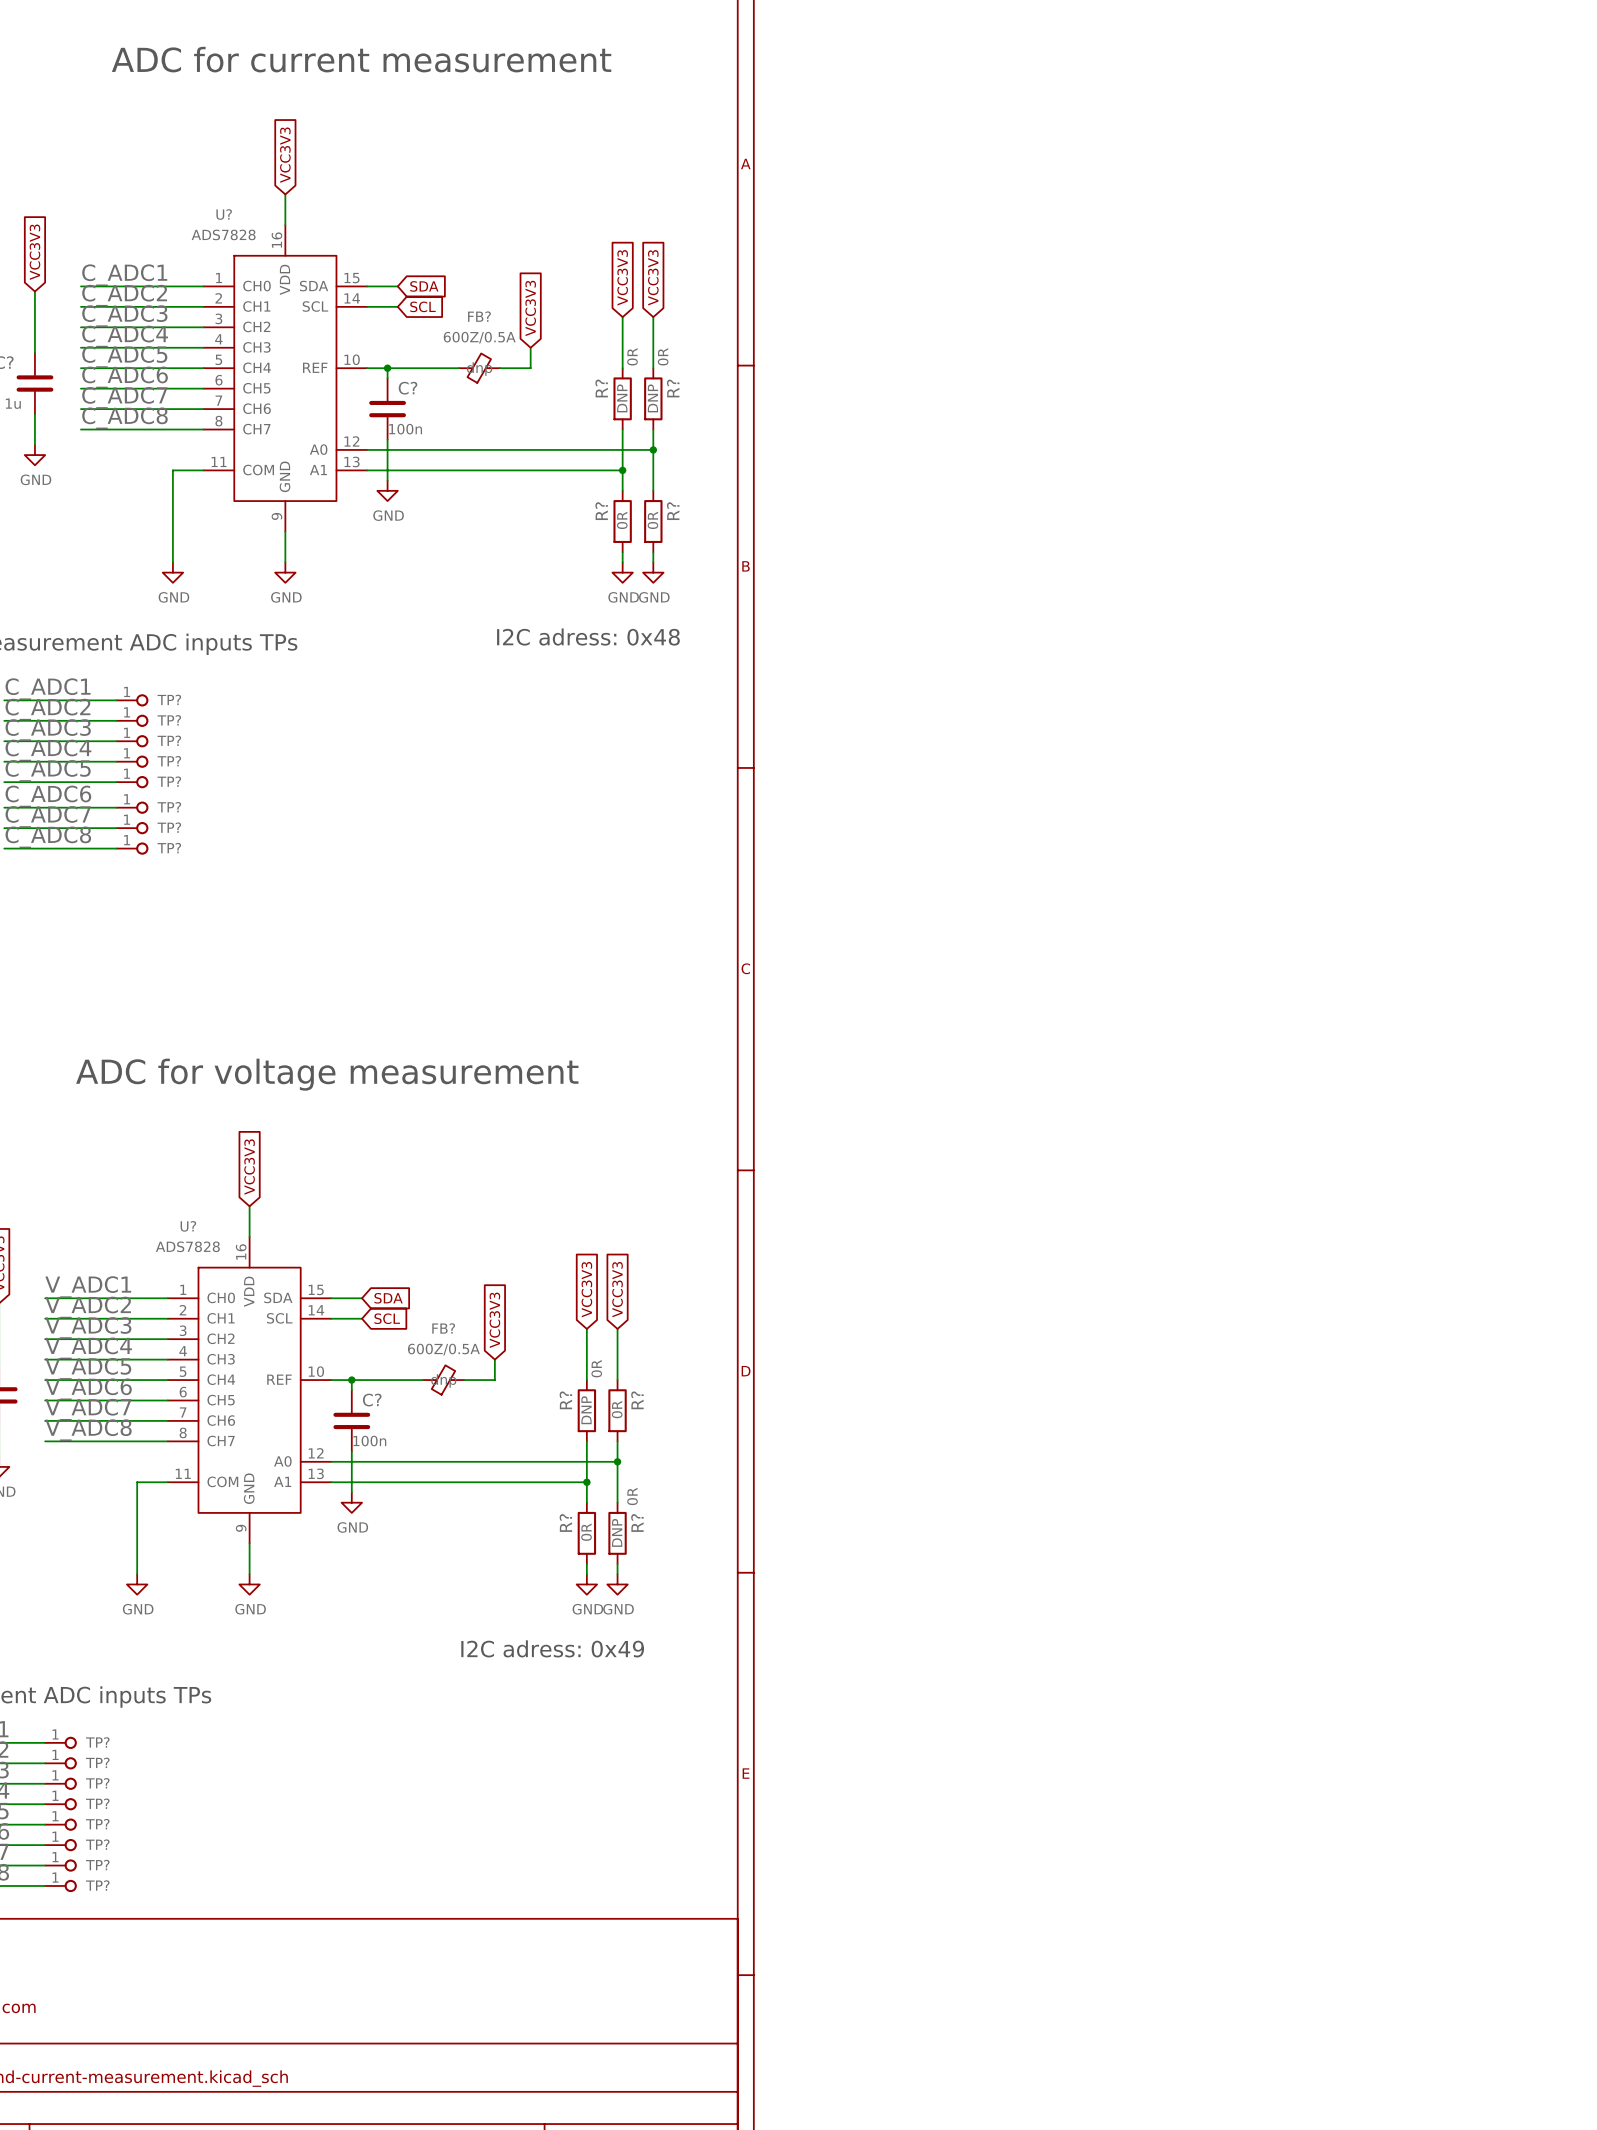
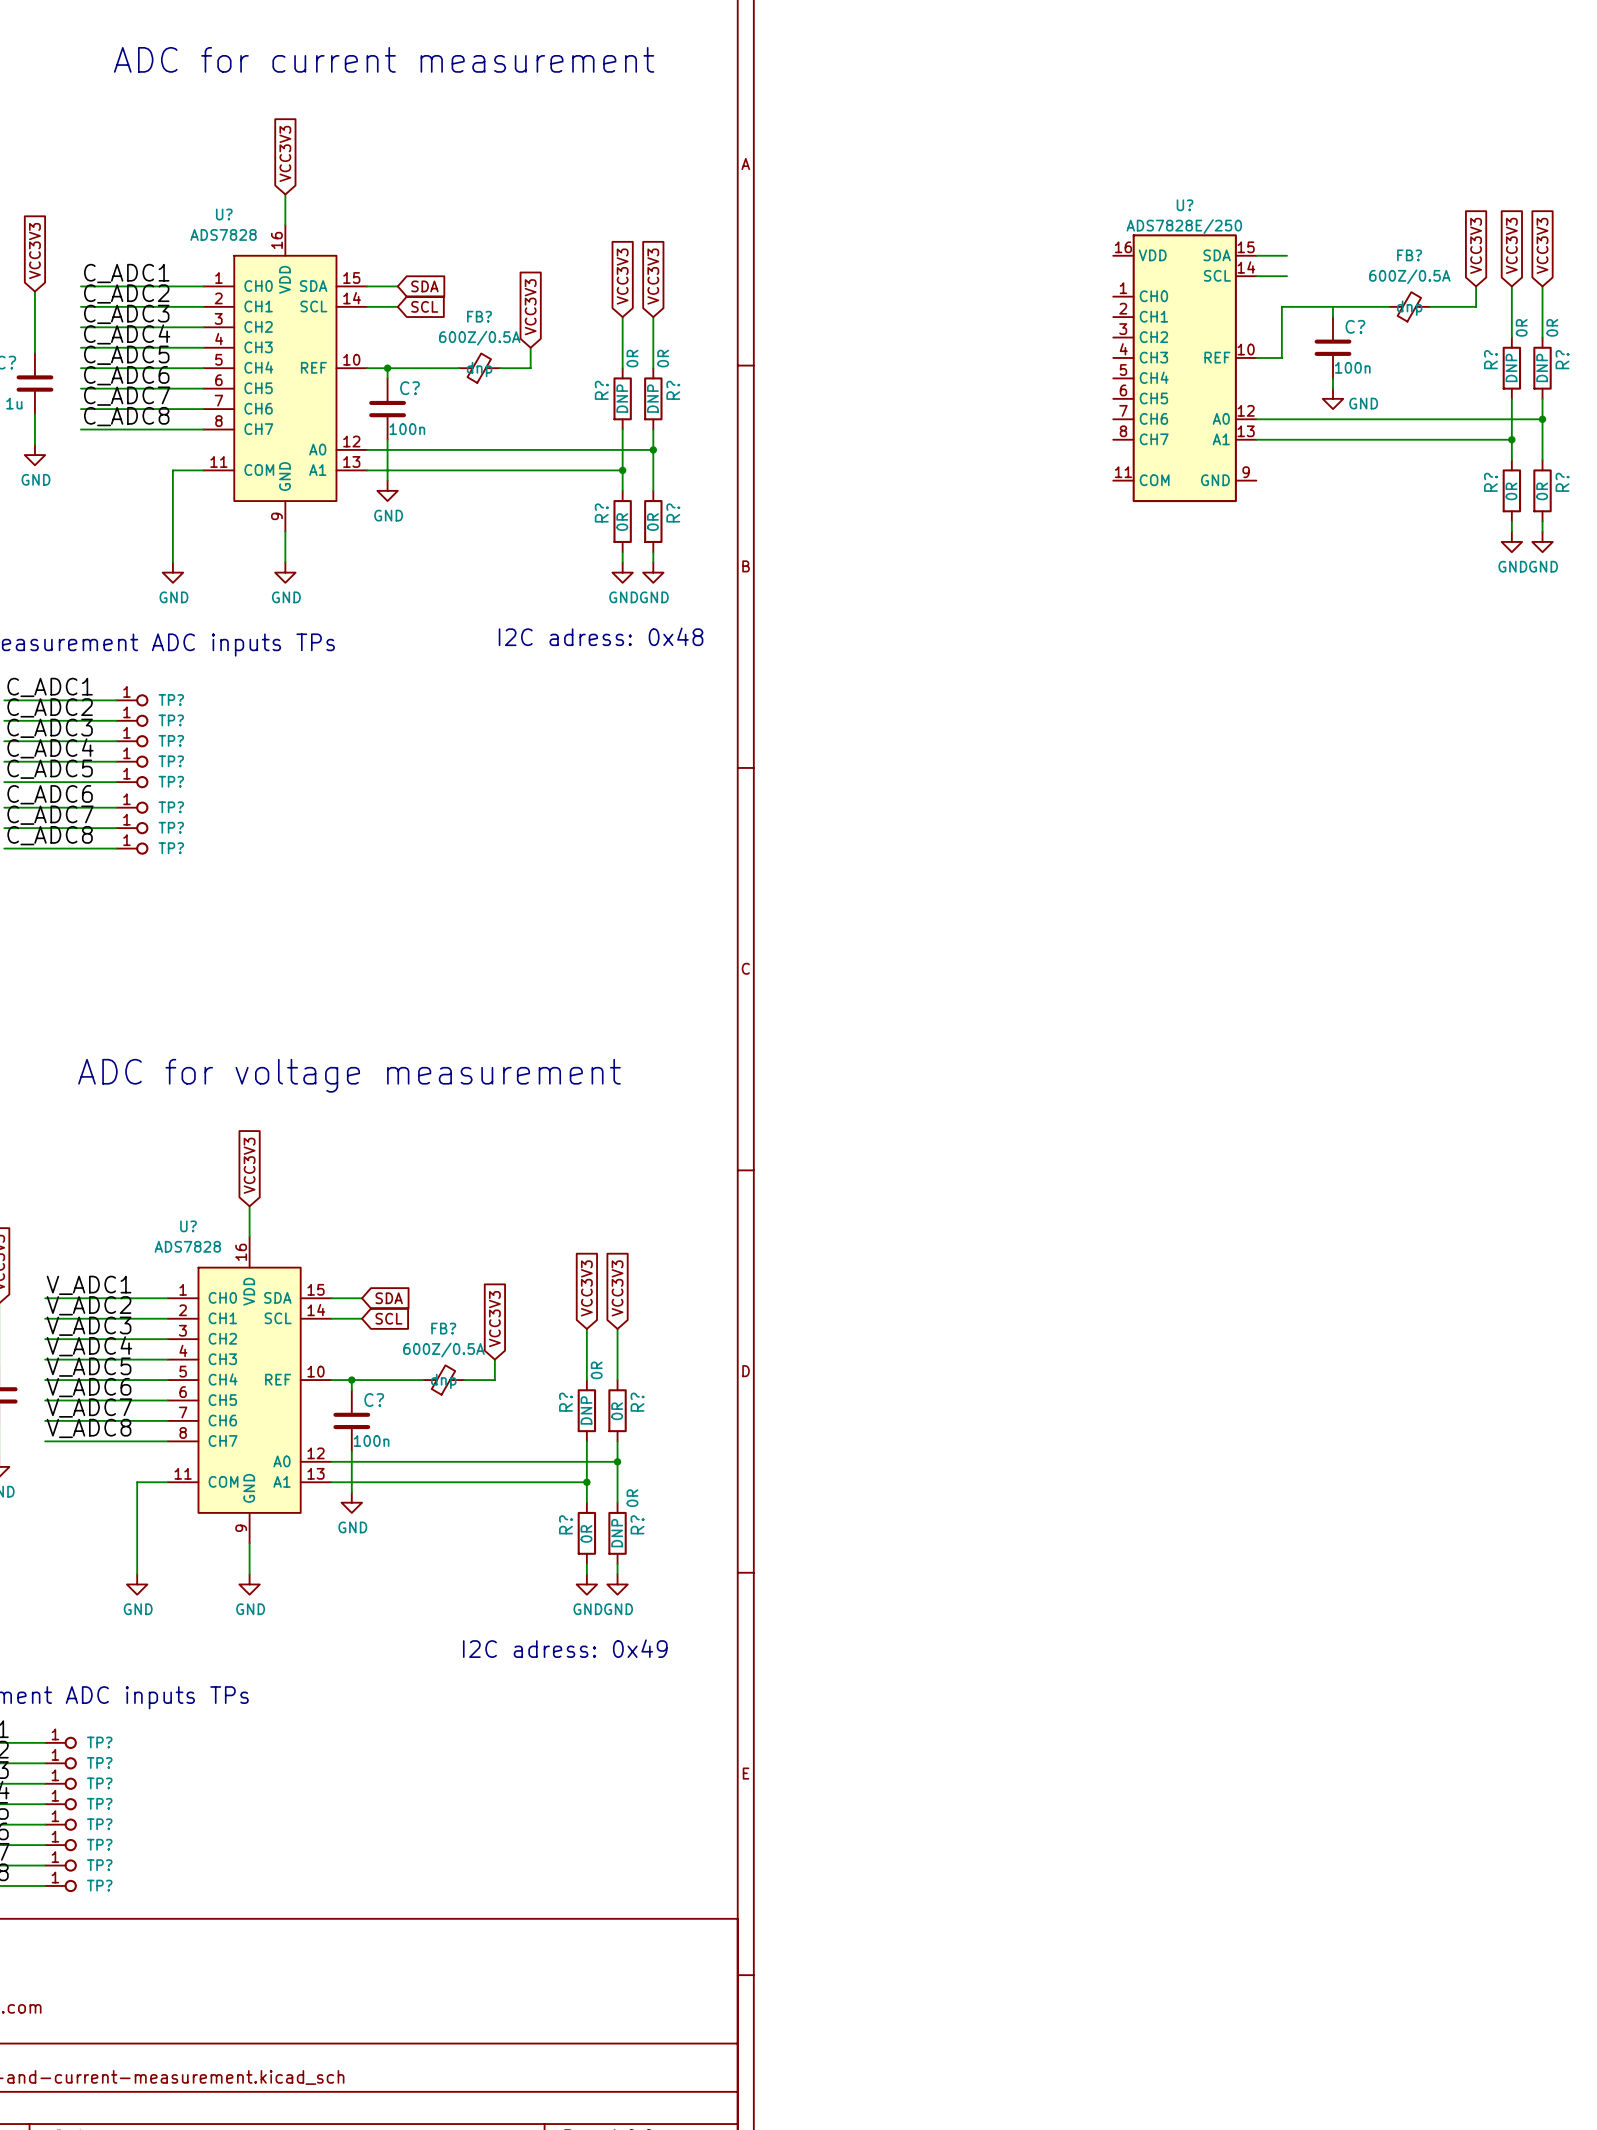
global label: none -> VCC3V3 (1476, 245)
global label: none -> VCC3V3 (1511, 245)
global label: none -> VCC3V3 (1542, 245)
wire: none -> (1256, 255) (1287, 255)
wire: none -> (1256, 276) (1287, 276)
wire: none -> (1476, 286) (1476, 306) (1430, 306)
wire: none -> (1511, 286) (1511, 337)
wire: none -> (1542, 286) (1542, 337)
wire: none -> (1333, 306) (1333, 317)
wire: none -> (1389, 306) (1281, 306) (1281, 357) (1256, 357)
FB?: none -> (1409, 306)
C?: none -> (1333, 347)
U?: none -> (1184, 368)
R?: none -> (1511, 368)
R?: none -> (1542, 368)
wire: none -> (1333, 378) (1333, 388)
power symbol: none -> GND (1333, 398)
wire: none -> (1511, 398) (1511, 460)
wire: none -> (1542, 398) (1542, 460)
wire: none -> (1256, 419) (1542, 419)
junction: none -> (1542, 419)
wire: none -> (1256, 439) (1511, 439)
junction: none -> (1511, 439)
R?: none -> (1511, 490)
R?: none -> (1542, 490)
wire: none -> (1511, 521) (1511, 531)
wire: none -> (1542, 521) (1542, 531)
power symbol: none -> GND (1511, 541)
power symbol: none -> GND (1542, 541)

